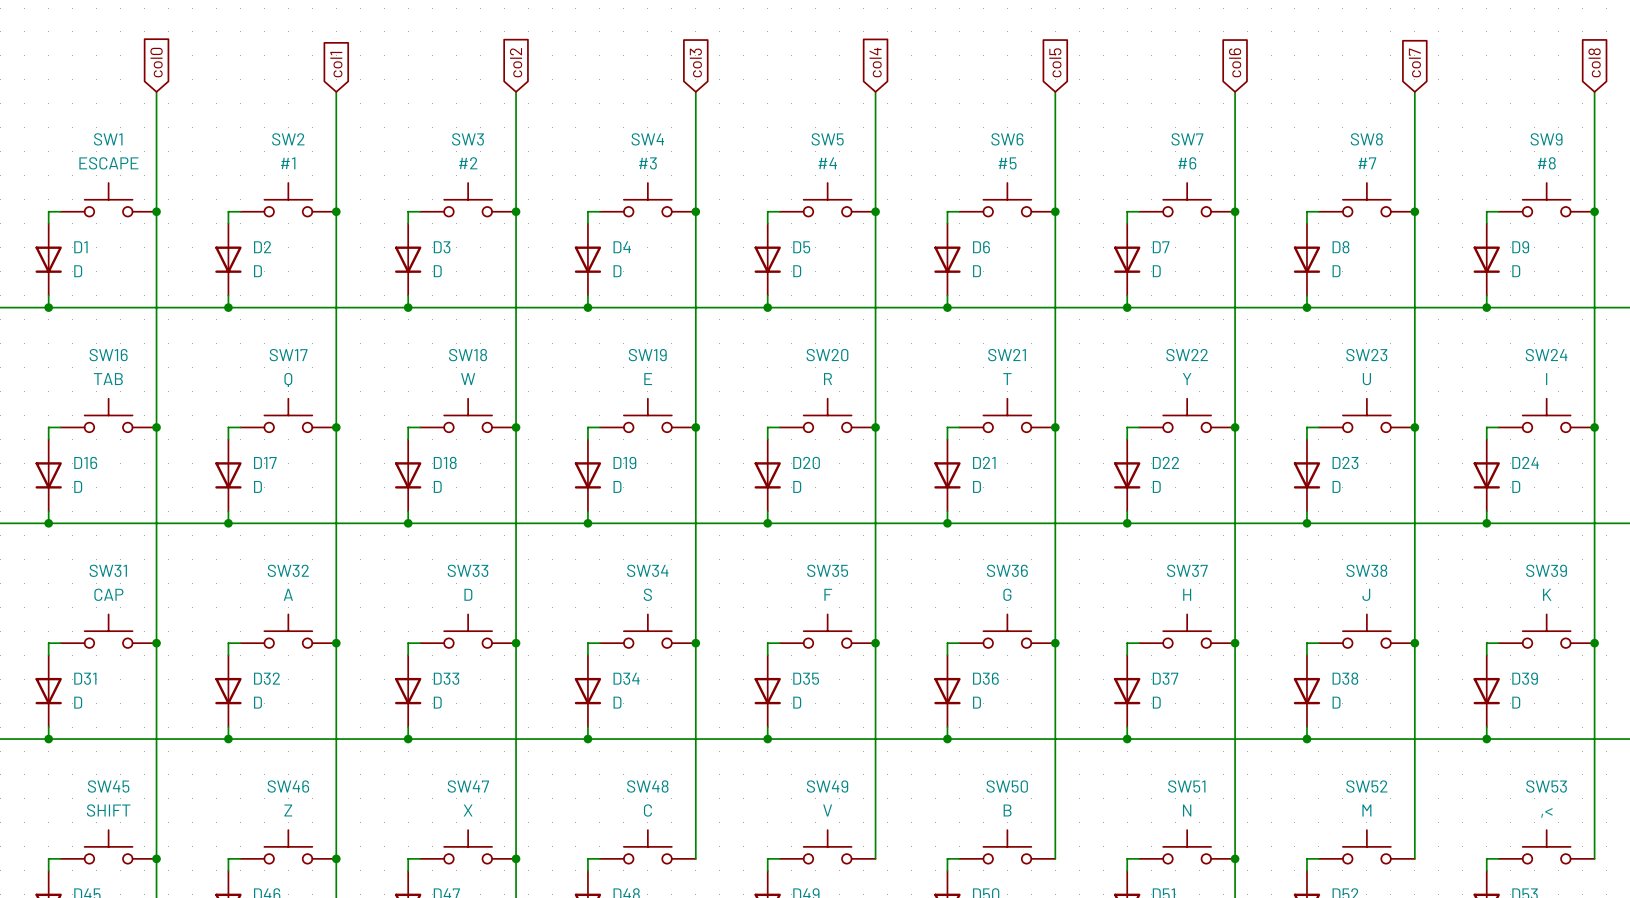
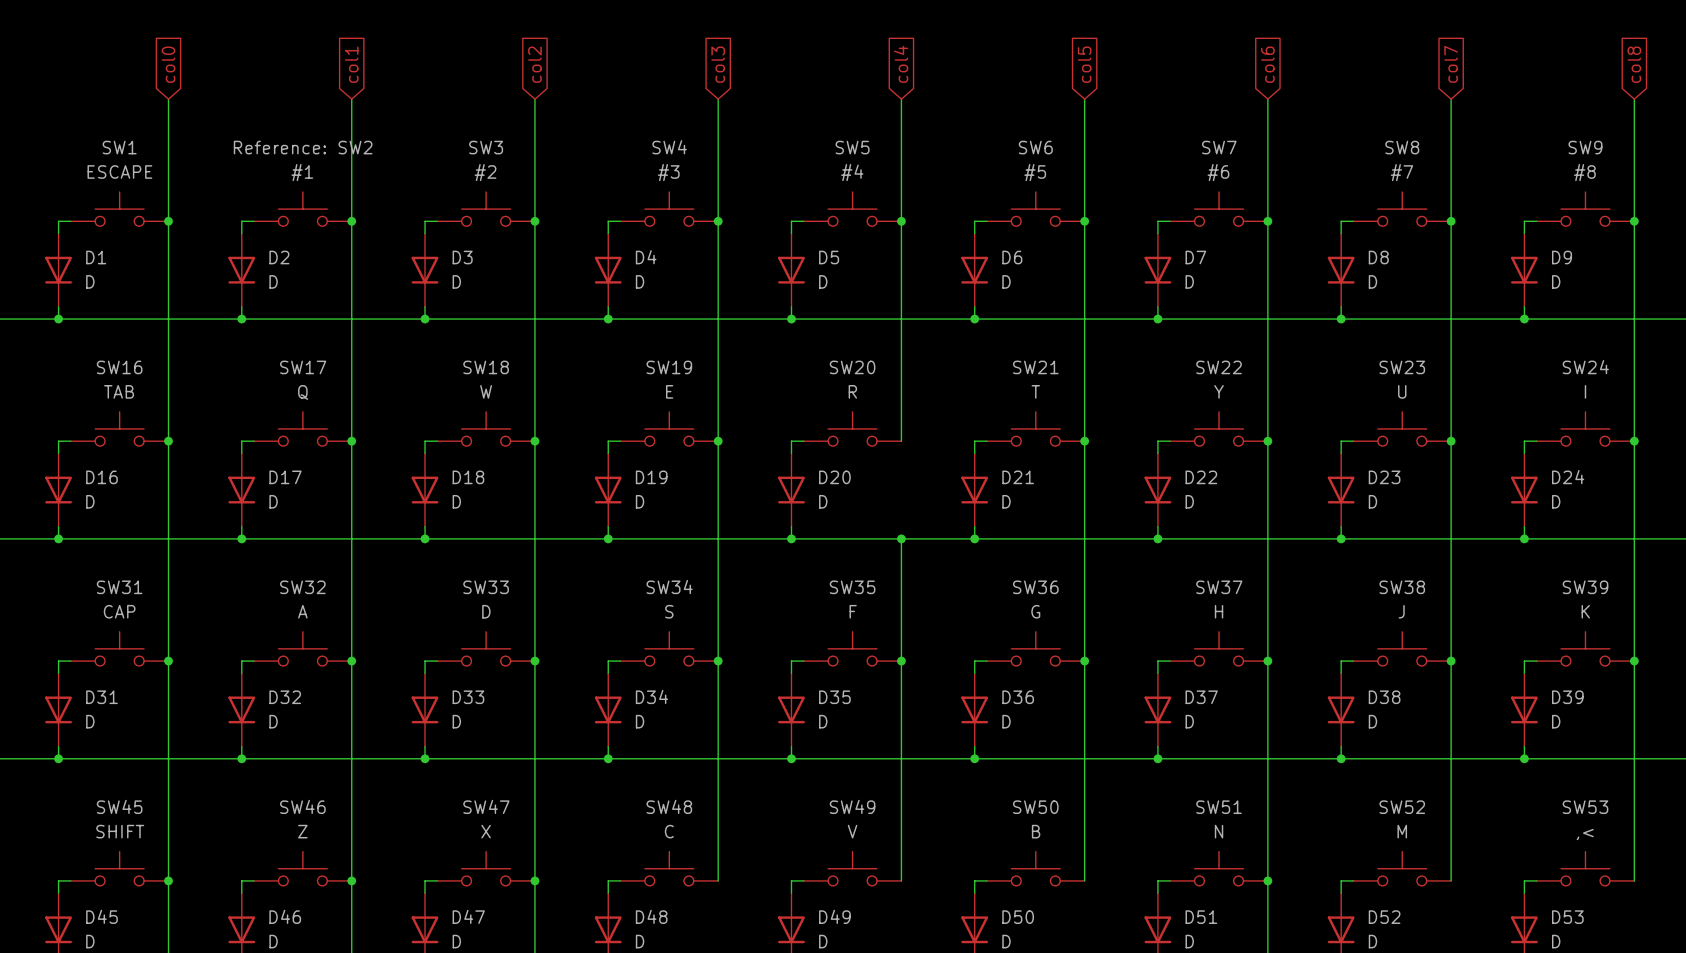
SW2 name: SW2 (288, 139) -> Reference: SW2 (303, 147)
wire: (875, 427) (875, 523) -> none
junction: (875, 427) -> none
junction: none -> (901, 538)

